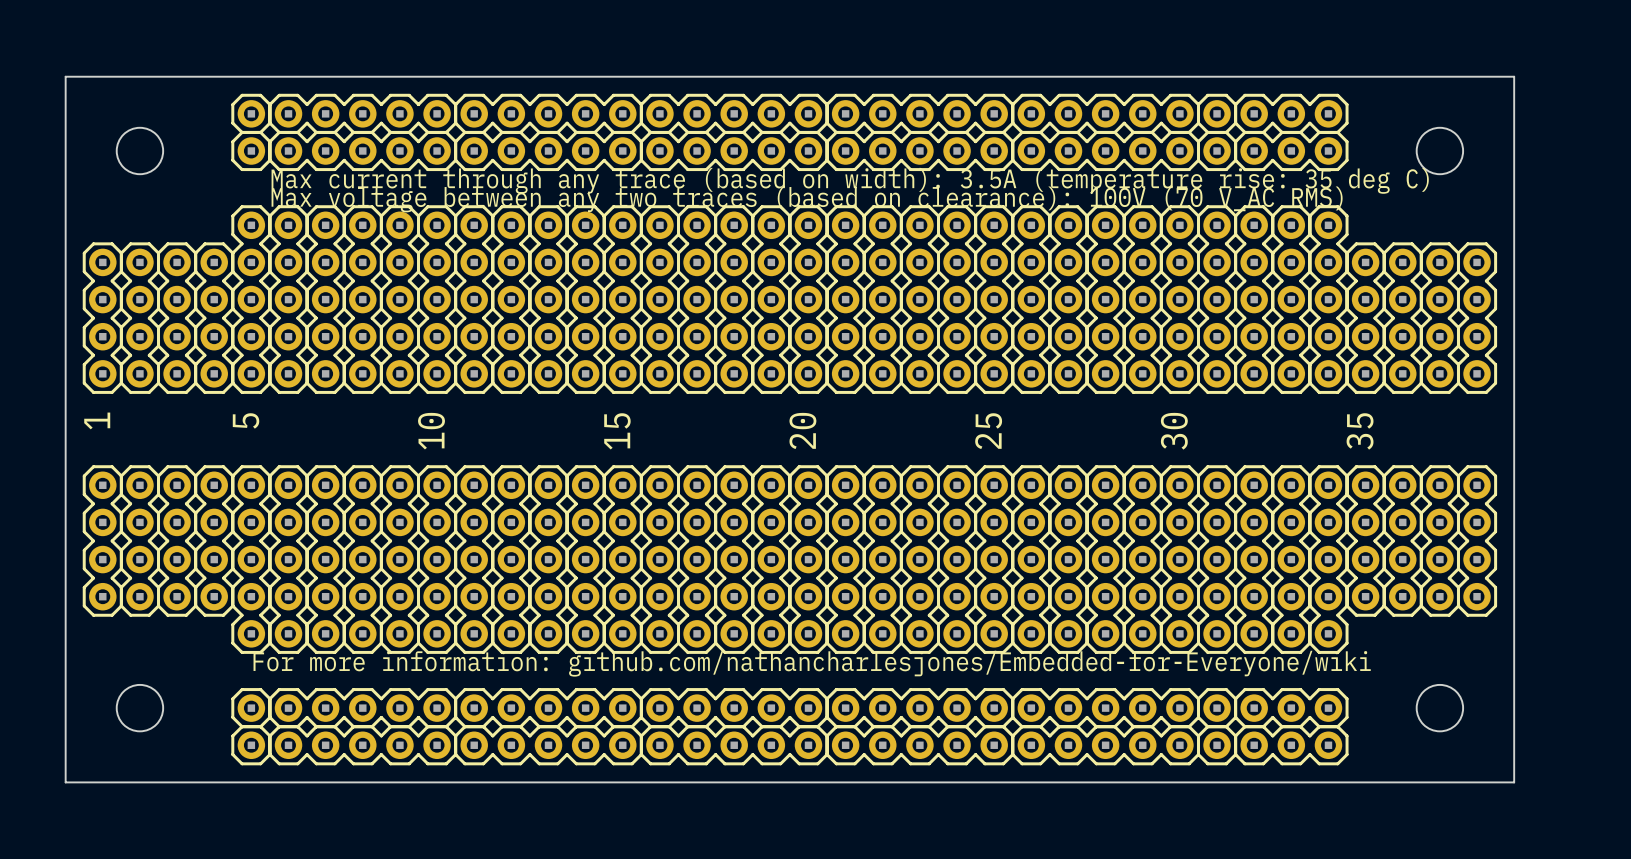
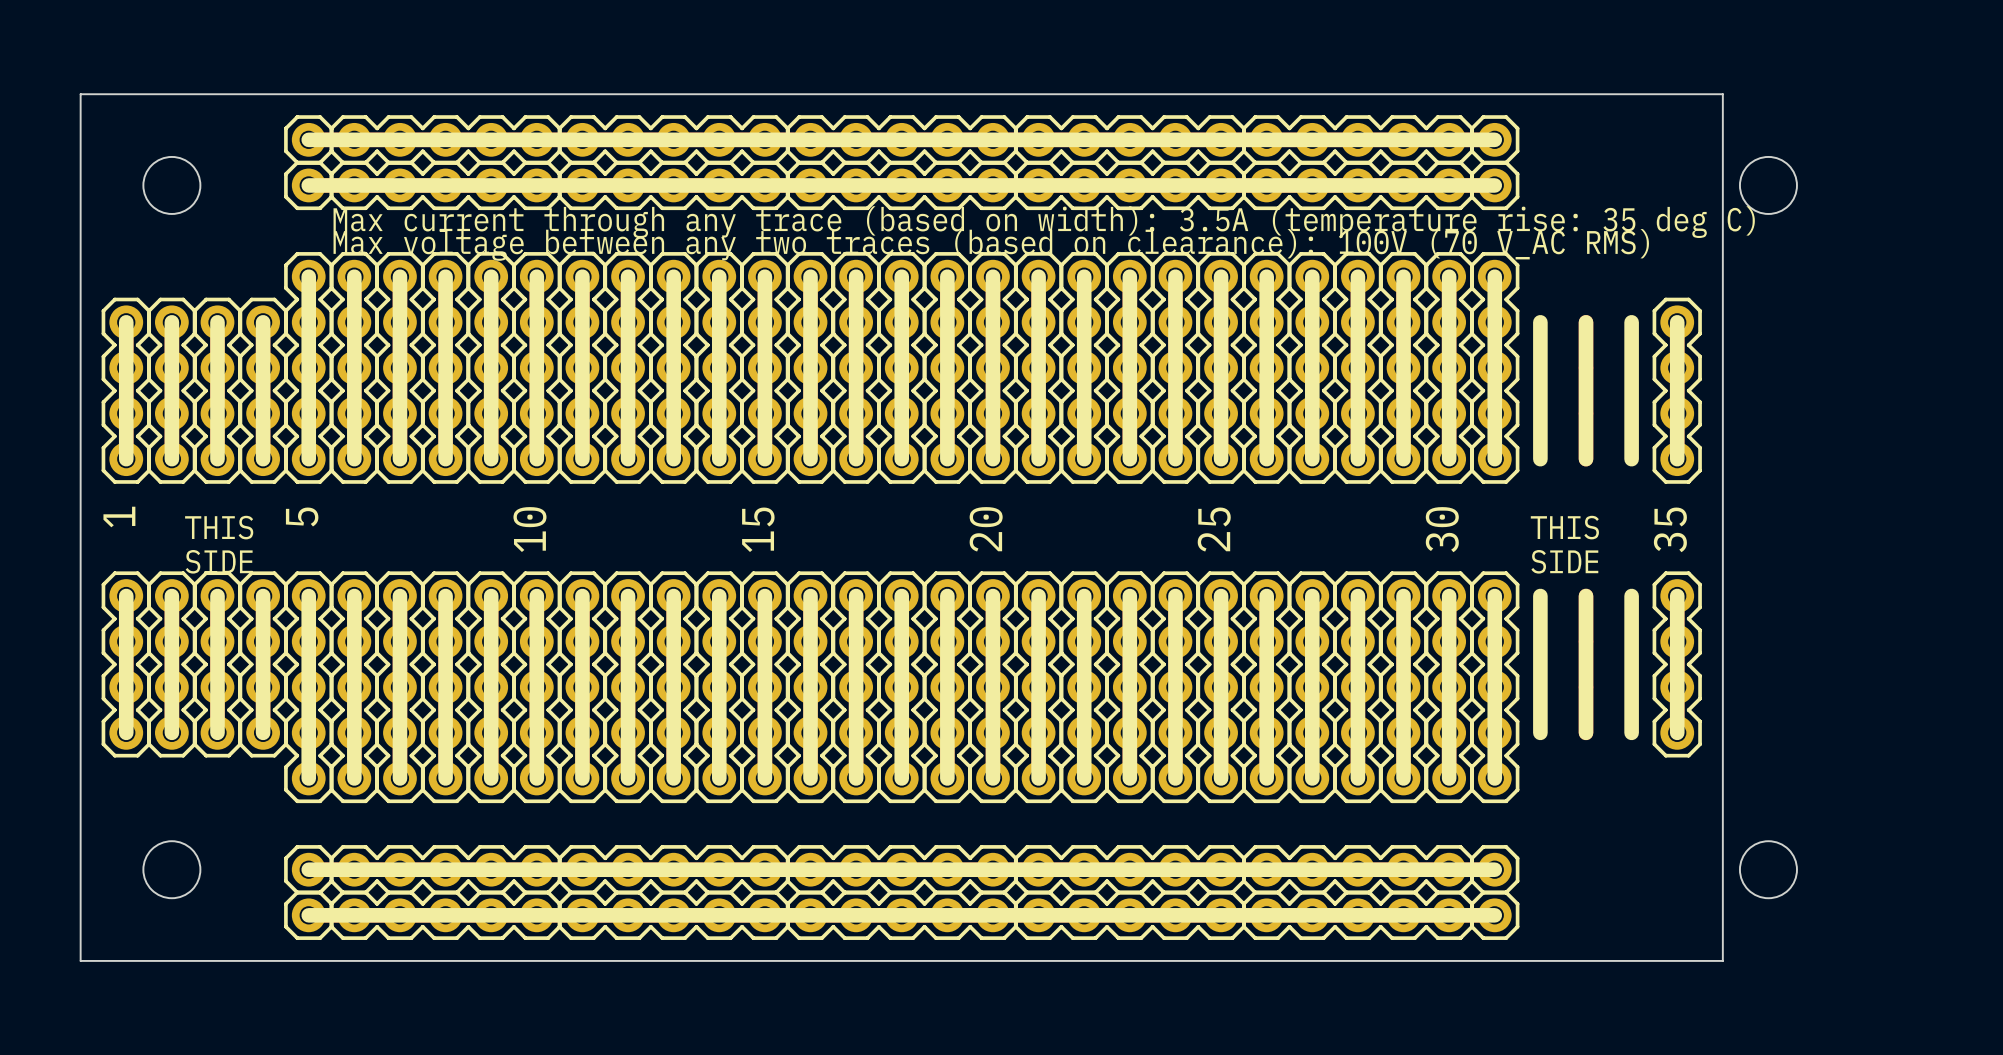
board edge: (1402, 76) (1514, 76) (1514, 782) (1402, 782) -> (1722, 94) (1722, 960)
line: none -> (308, 139) (1494, 139)
part: (1291, 113) -> none
line: none -> (308, 185) (1494, 185)
part: (1291, 151) -> none
line: none -> (308, 276) (308, 459)
line: none -> (354, 276) (354, 459)
line: none -> (399, 276) (399, 459)
line: none -> (445, 276) (445, 459)
line: none -> (491, 276) (491, 459)
line: none -> (536, 276) (536, 459)
line: none -> (582, 276) (582, 459)
line: none -> (628, 276) (628, 459)
line: none -> (673, 276) (673, 459)
line: none -> (719, 276) (719, 459)
line: none -> (764, 276) (764, 459)
line: none -> (810, 276) (810, 459)
line: none -> (856, 276) (856, 459)
line: none -> (901, 276) (901, 459)
line: none -> (947, 276) (947, 459)
line: none -> (992, 276) (992, 459)
line: none -> (1038, 276) (1038, 459)
line: none -> (1084, 276) (1084, 459)
line: none -> (1129, 276) (1129, 459)
line: none -> (1175, 276) (1175, 459)
line: none -> (1221, 276) (1221, 459)
line: none -> (1266, 276) (1266, 459)
line: none -> (1312, 276) (1312, 459)
line: none -> (1357, 276) (1357, 459)
line: none -> (1403, 276) (1403, 459)
line: none -> (1449, 276) (1449, 459)
line: none -> (1494, 276) (1494, 459)
line: none -> (126, 322) (126, 459)
line: none -> (171, 322) (171, 459)
line: none -> (217, 322) (217, 459)
line: none -> (263, 322) (263, 459)
line: none -> (1540, 322) (1540, 459)
line: none -> (1586, 322) (1586, 459)
line: none -> (1631, 322) (1631, 459)
line: none -> (1677, 322) (1677, 459)
part: (1254, 299) -> none
part: (1291, 299) -> none
part: (1328, 299) -> none
part: (1402, 318) -> none
part: (1439, 318) -> none
part: (1477, 318) -> none
text: none -> THIS (219, 527)
text: none -> THIS (1564, 527)
text: none -> SIDE (219, 561)
text: none -> SIDE (1564, 561)
line: none -> (126, 596) (126, 732)
line: none -> (171, 596) (171, 732)
line: none -> (217, 596) (217, 732)
line: none -> (263, 596) (263, 732)
line: none -> (308, 596) (308, 778)
line: none -> (354, 596) (354, 778)
line: none -> (399, 596) (399, 778)
line: none -> (445, 596) (445, 778)
line: none -> (491, 596) (491, 778)
line: none -> (536, 596) (536, 778)
line: none -> (582, 596) (582, 778)
line: none -> (628, 596) (628, 778)
line: none -> (673, 596) (673, 778)
line: none -> (719, 596) (719, 778)
line: none -> (764, 596) (764, 778)
line: none -> (810, 596) (810, 778)
line: none -> (856, 596) (856, 778)
line: none -> (901, 596) (901, 778)
line: none -> (947, 596) (947, 778)
line: none -> (992, 596) (992, 778)
line: none -> (1038, 596) (1038, 778)
line: none -> (1084, 596) (1084, 778)
line: none -> (1129, 596) (1129, 778)
line: none -> (1175, 596) (1175, 778)
line: none -> (1221, 596) (1221, 778)
line: none -> (1266, 596) (1266, 778)
line: none -> (1312, 596) (1312, 778)
line: none -> (1357, 596) (1357, 778)
line: none -> (1403, 596) (1403, 778)
line: none -> (1449, 596) (1449, 778)
line: none -> (1494, 596) (1494, 778)
line: none -> (1540, 596) (1540, 732)
line: none -> (1586, 596) (1586, 732)
line: none -> (1631, 596) (1631, 732)
line: none -> (1677, 596) (1677, 732)
part: (1402, 540) -> none
part: (1439, 540) -> none
part: (1477, 540) -> none
part: (1254, 559) -> none
part: (1291, 559) -> none
part: (1328, 559) -> none
text: For more information: github.com/nathancharlesjones/Embedded-for-Everyone/wiki (812, 663) -> none
line: none -> (308, 869) (1494, 869)
part: (1291, 708) -> none
line: none -> (308, 915) (1494, 915)
part: (1291, 745) -> none

